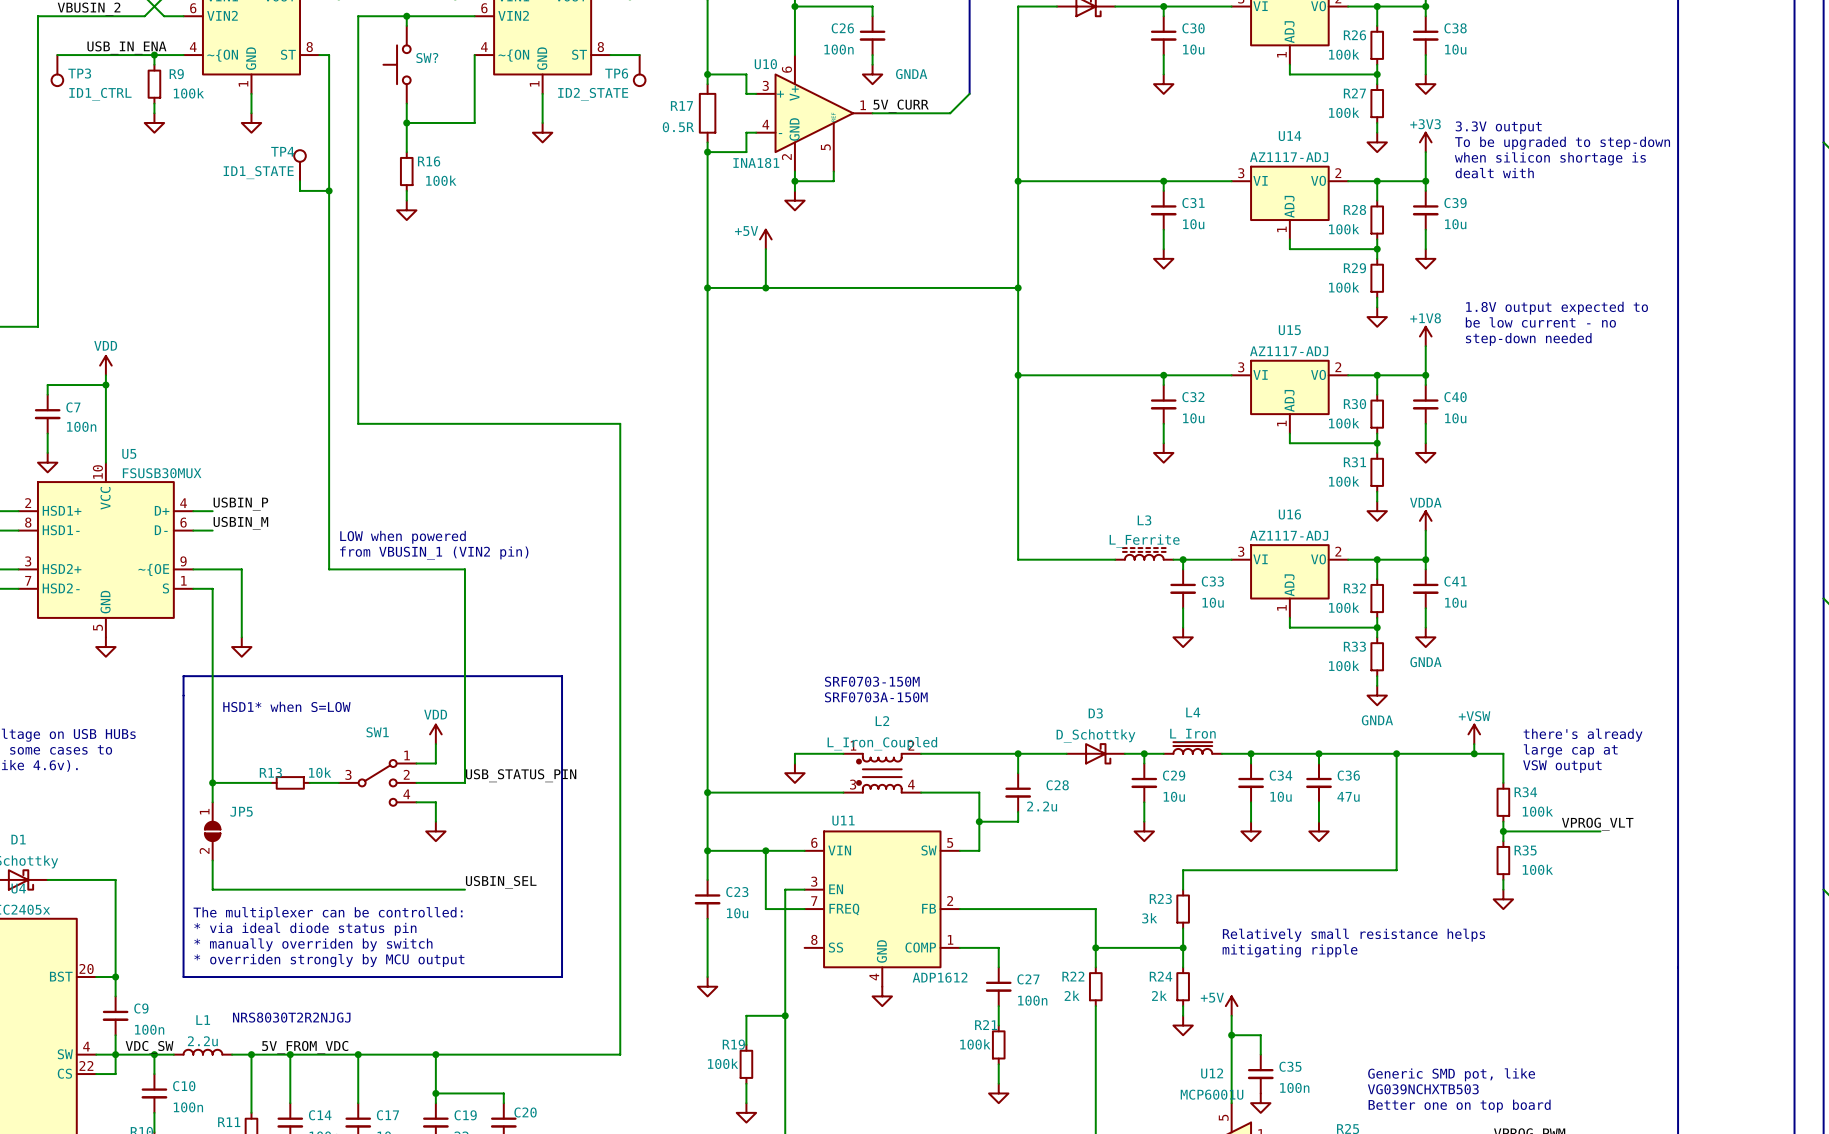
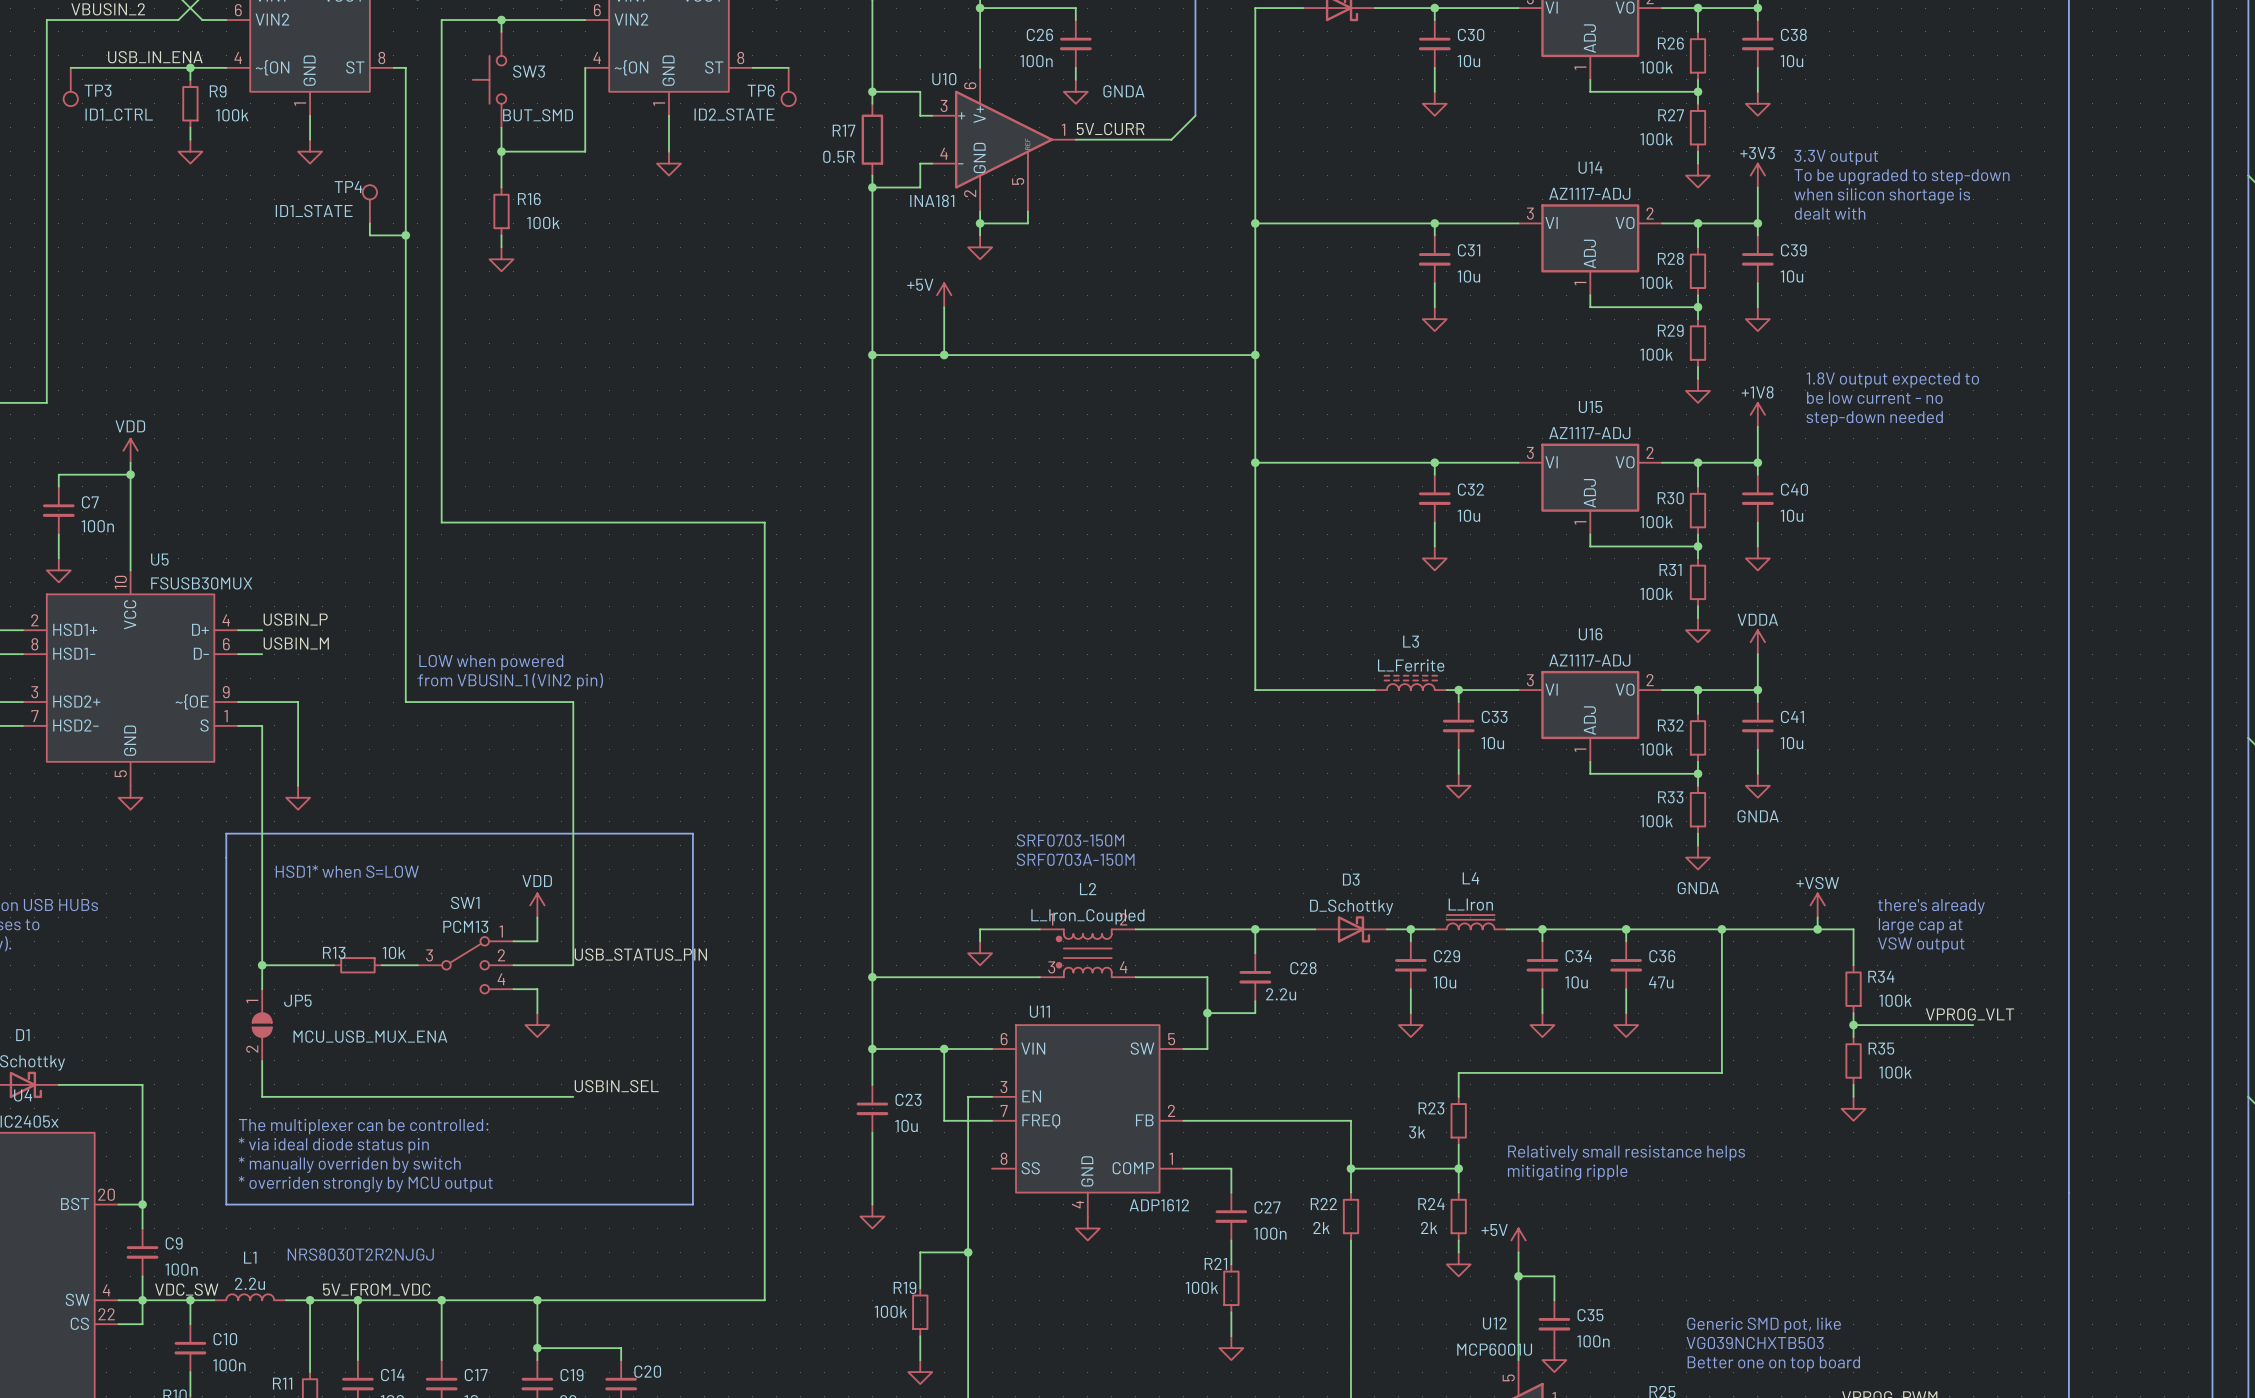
SW? name: SW? (427, 58) -> SW3 (529, 71)
SW? value: none -> BUT_SMD (538, 115)
SW1 value: none -> PCM13 (465, 926)
JP5 value: none -> MCU_USB_MUX_ENA (370, 1036)

